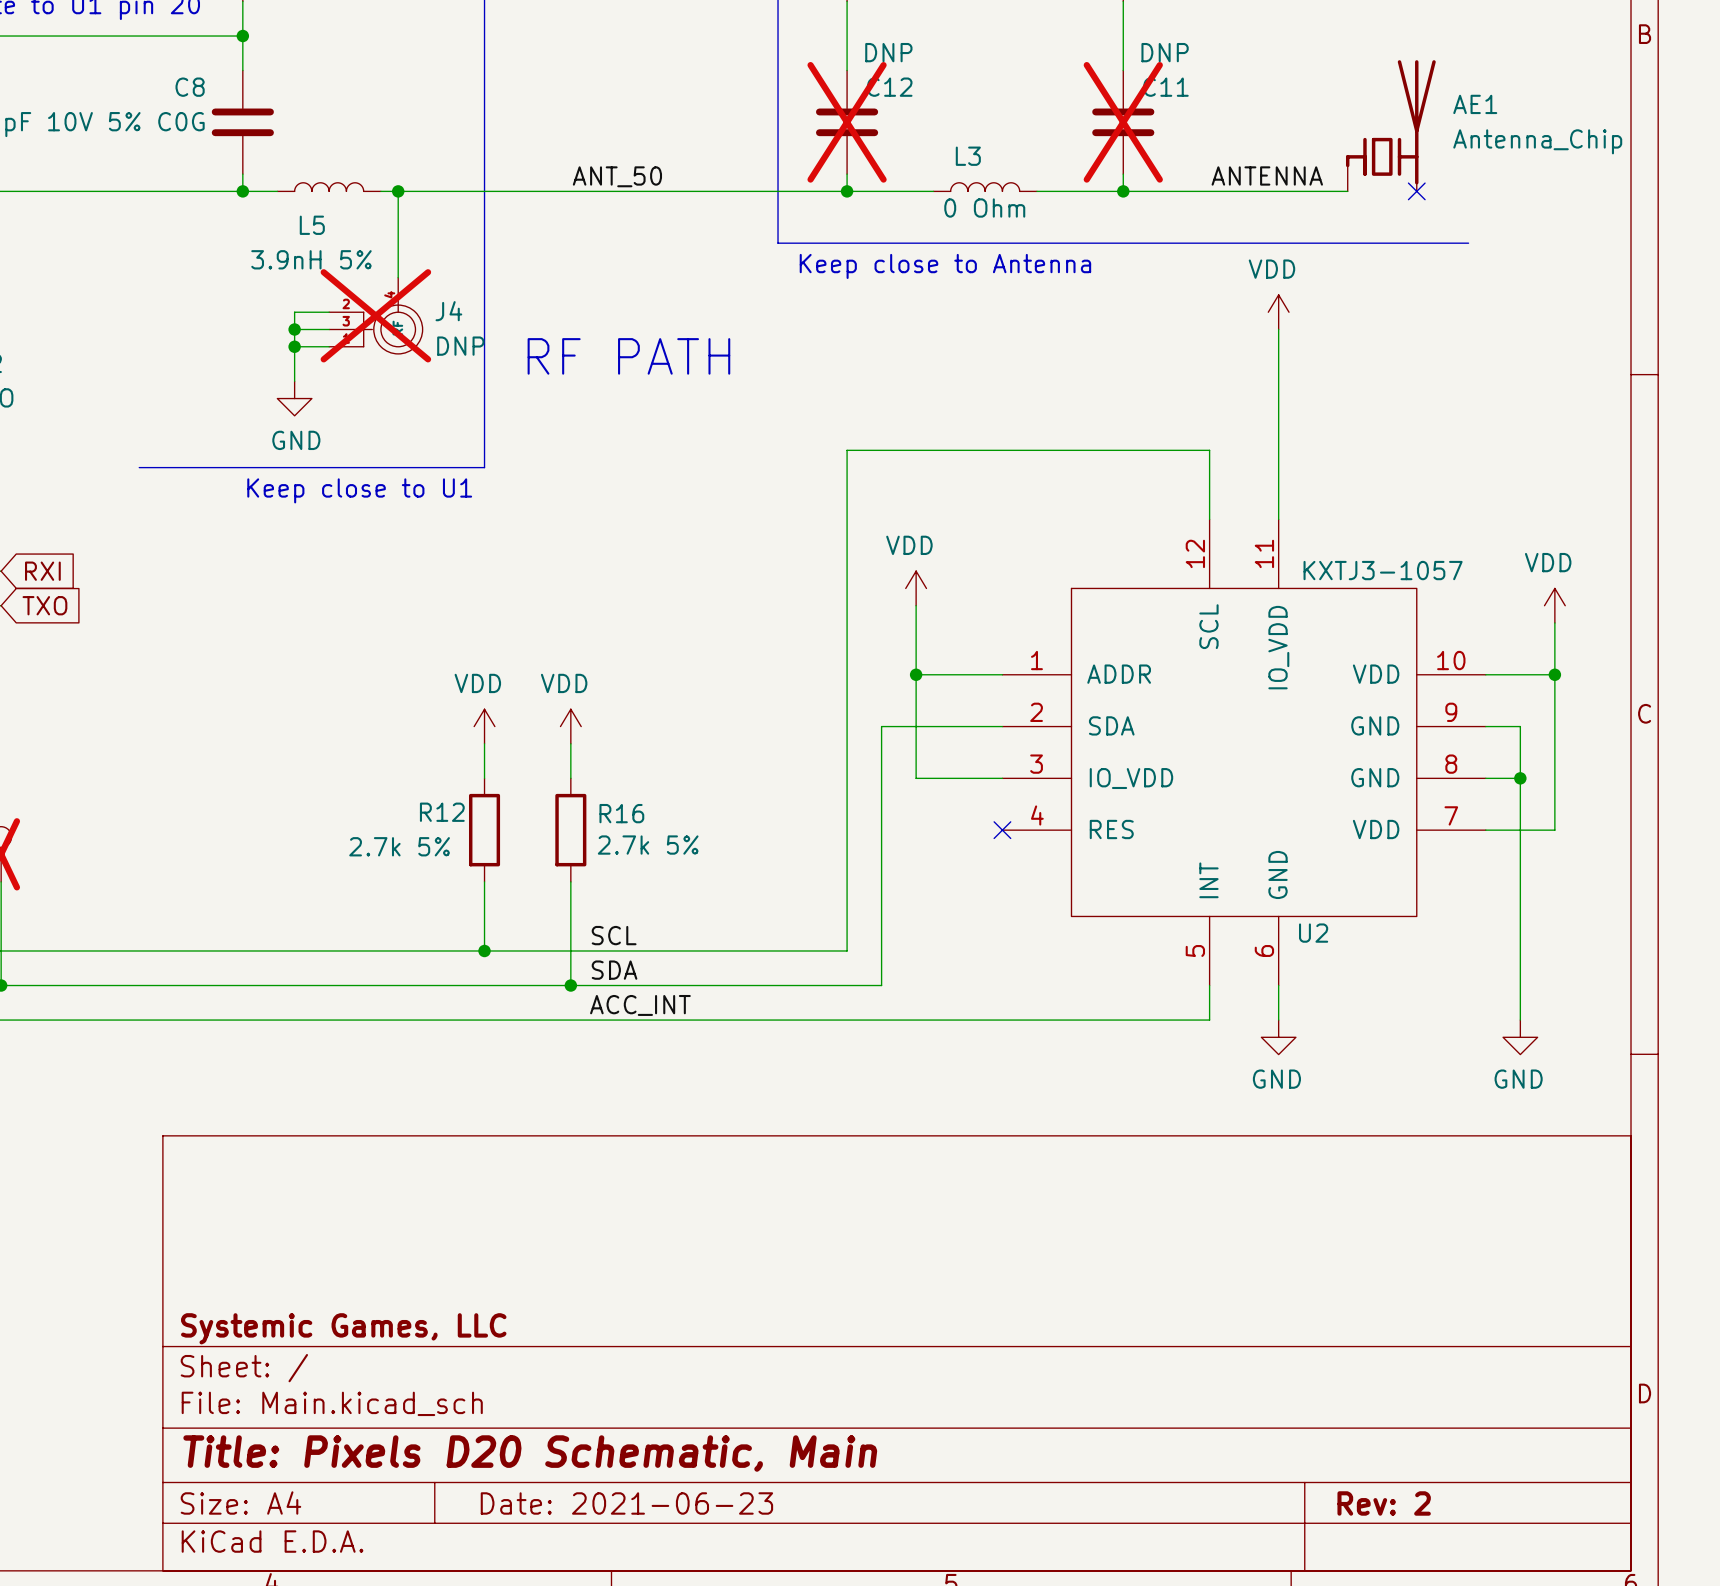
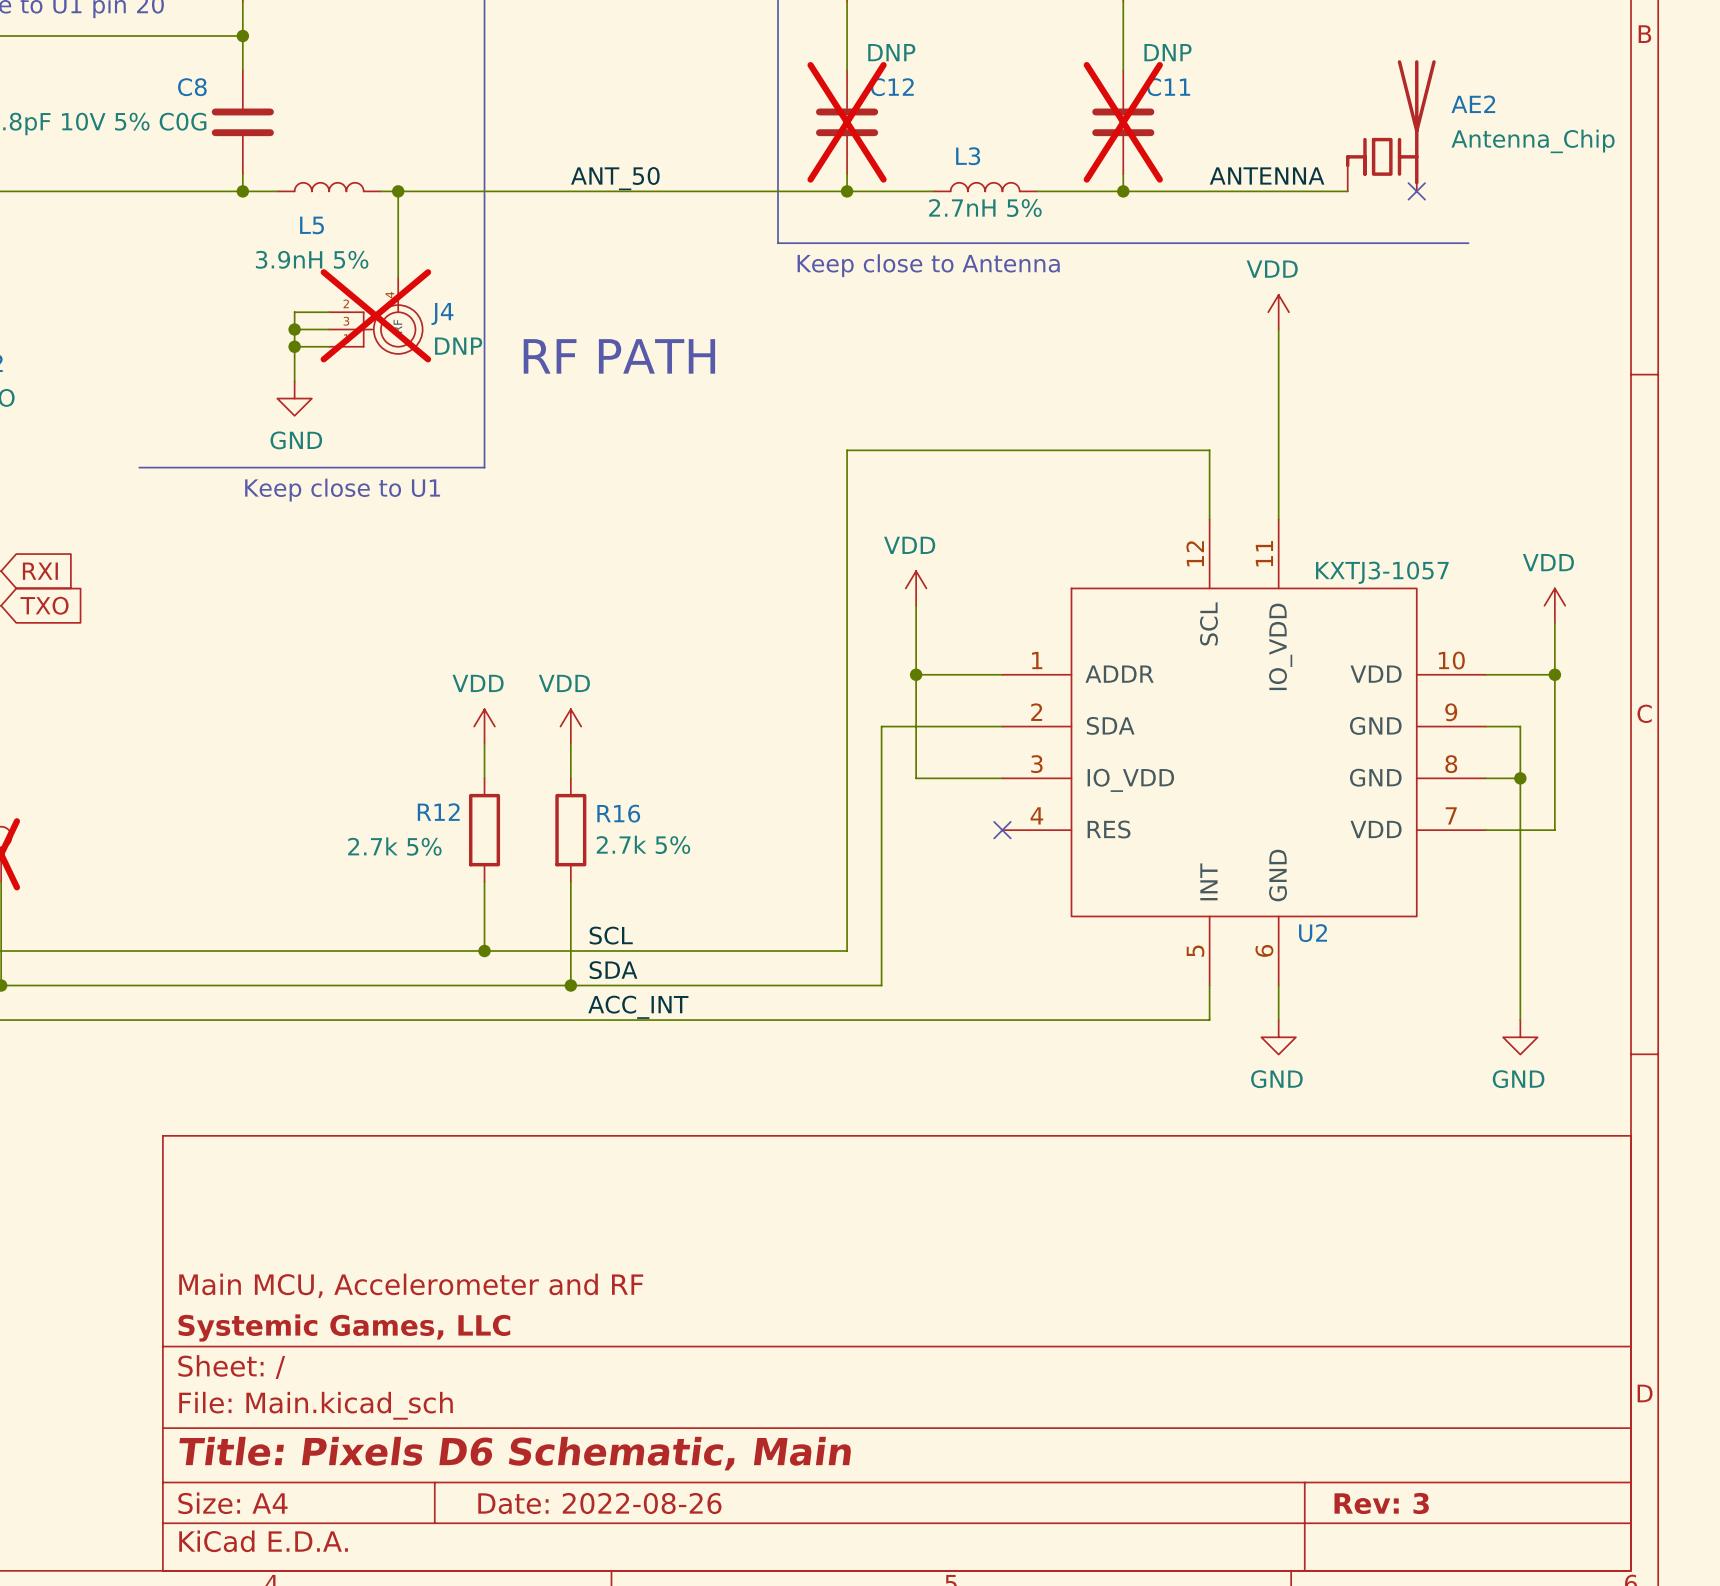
AE1 name: AE1 (1475, 104) -> AE2 (1473, 104)
L3 value: 0 Ohm (984, 208) -> 2.7nH 5% (985, 208)
title block: none -> Main MCU, Accelerometer and RF (411, 1285)
title block: Title: Pixels D20 Schematic, Main (530, 1453) -> Title: Pixels D6 Schematic, Main (515, 1453)
title block: Date: 2021-06-23 (626, 1503) -> Date: 2022-08-26 (599, 1503)
title block: Rev: 2 (1384, 1503) -> Rev: 3 (1381, 1503)

